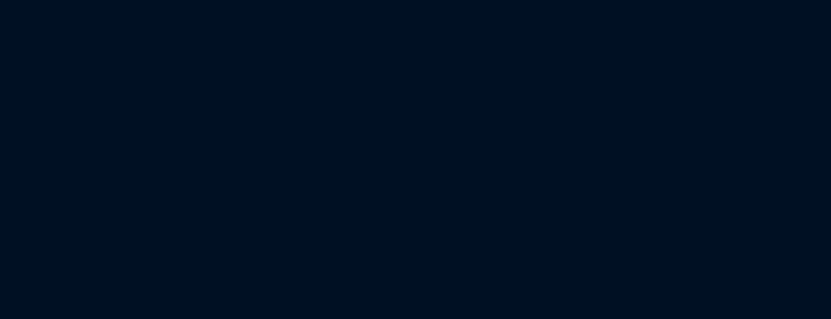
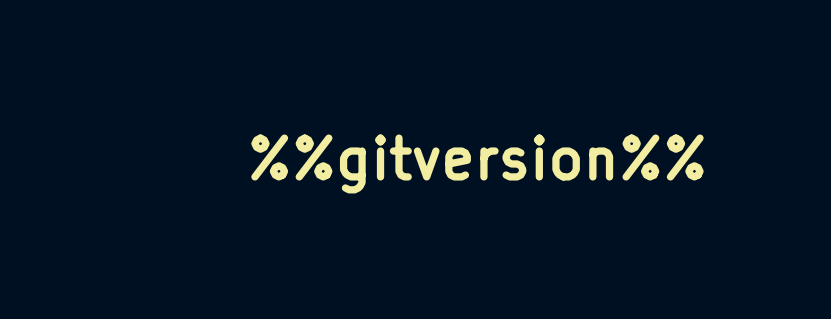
text: none -> %%gitversion%% (477, 163)

